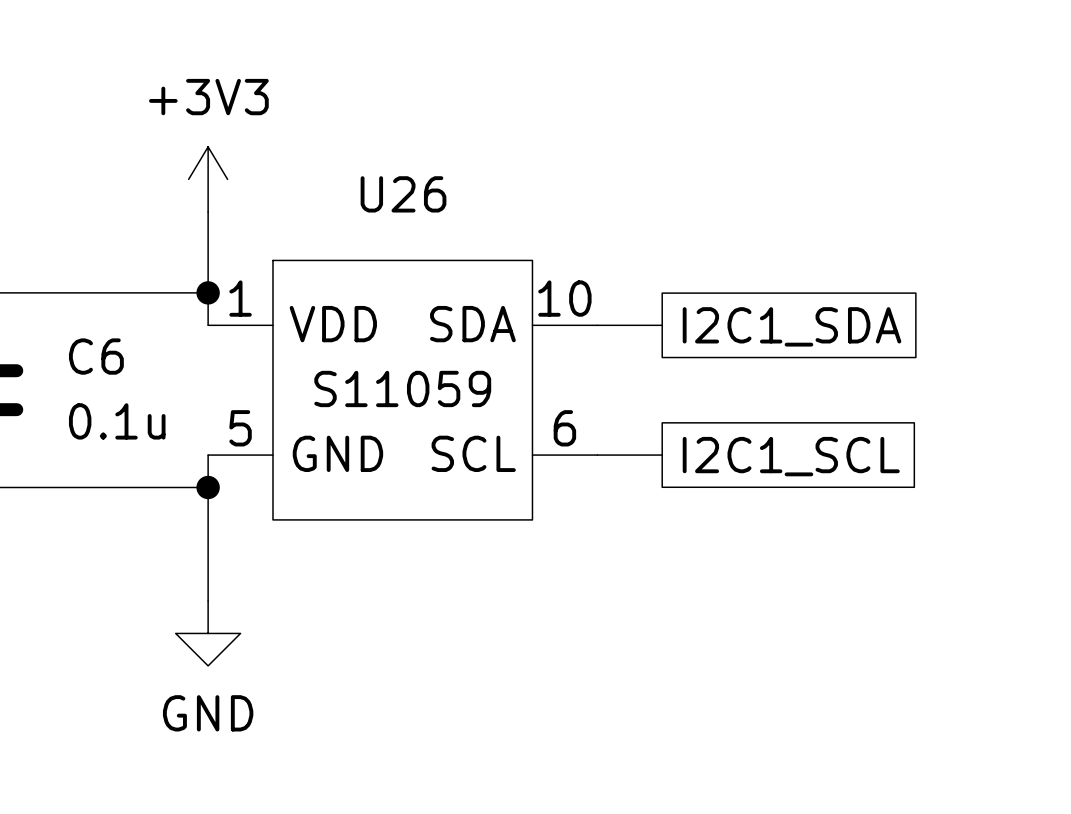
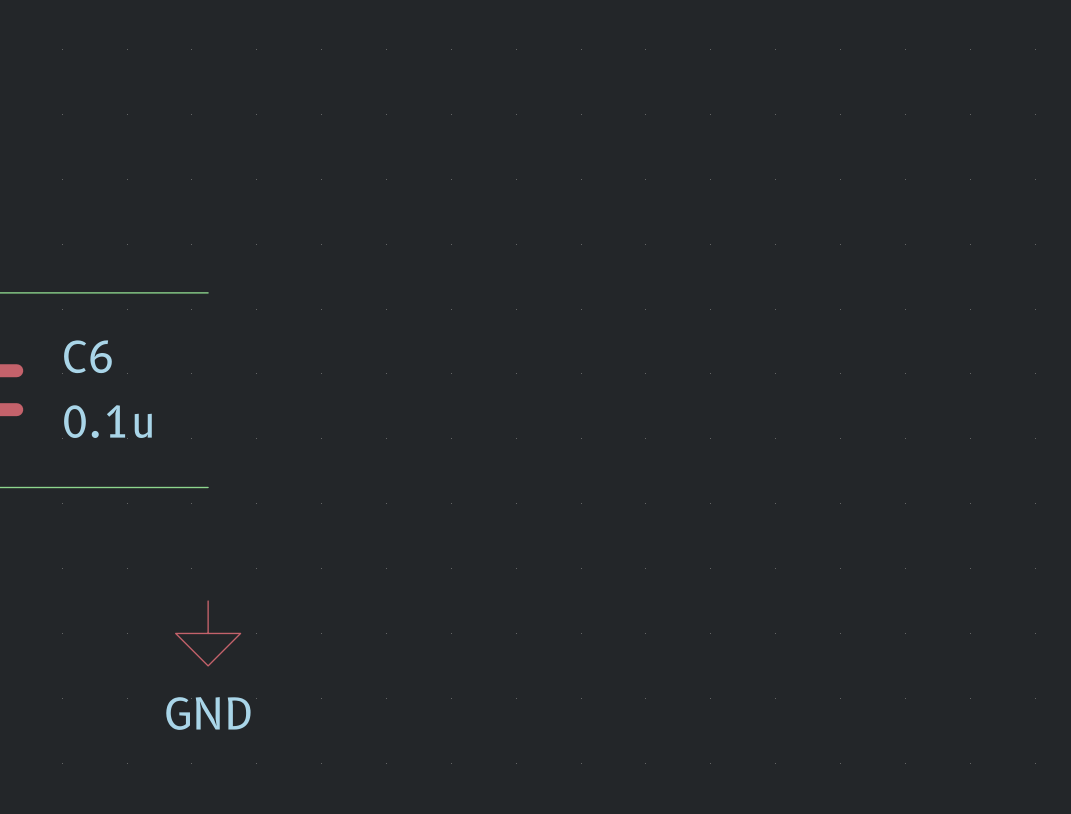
power symbol: +3V3 (208, 179) -> none
wire: (208, 211) (208, 325) -> none
junction: (208, 292) -> none
wire: (597, 325) (662, 325) -> none
global label: I2C1_SDA (792, 326) -> none
U26: (402, 390) -> none
wire: (208, 455) (208, 601) -> none
wire: (597, 455) (662, 455) -> none
global label: I2C1_SCL (791, 456) -> none
junction: (208, 487) -> none

